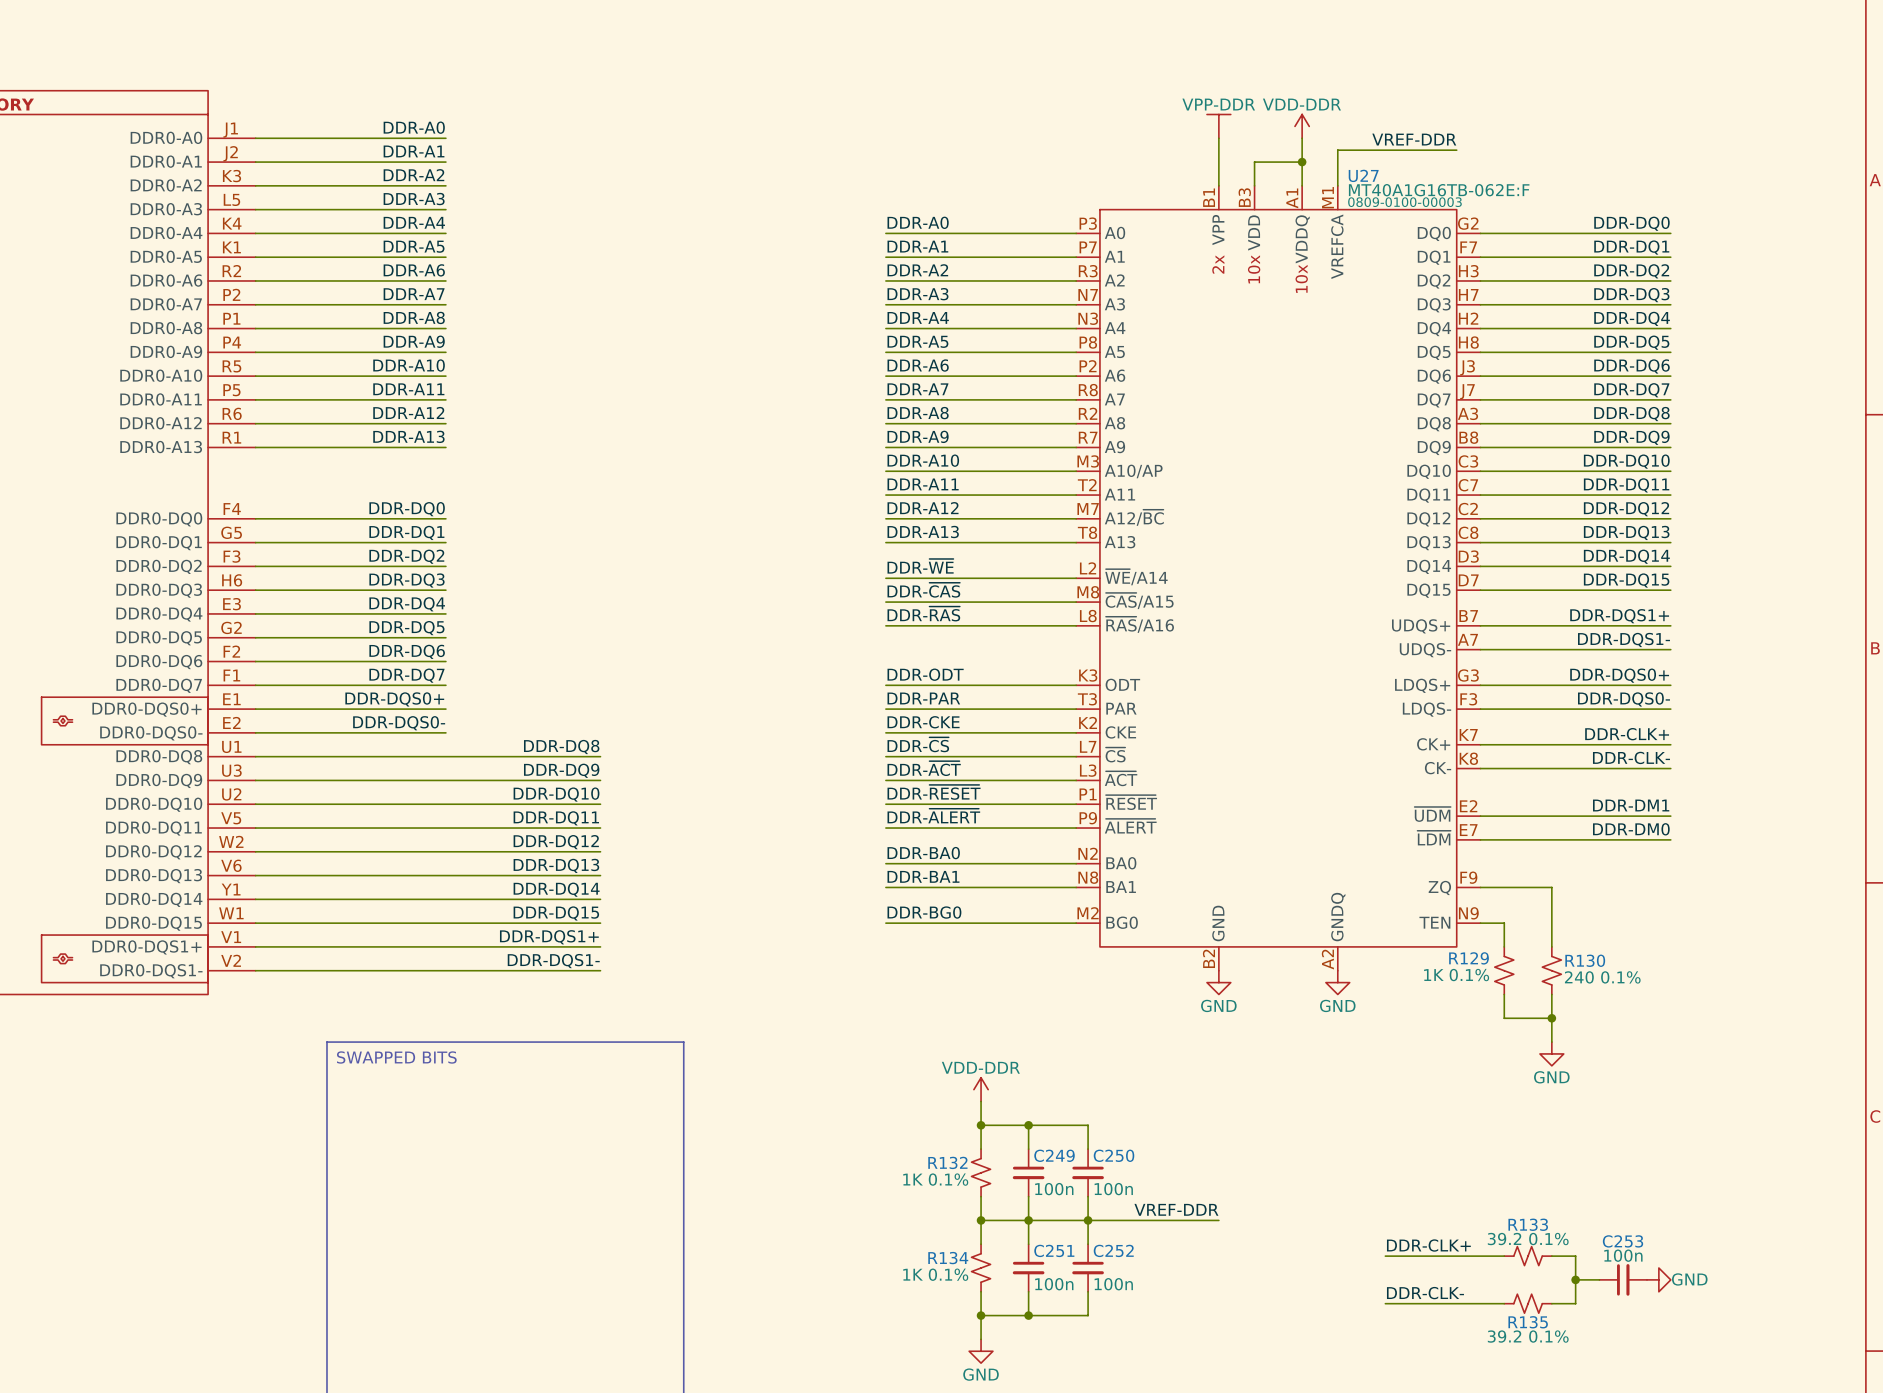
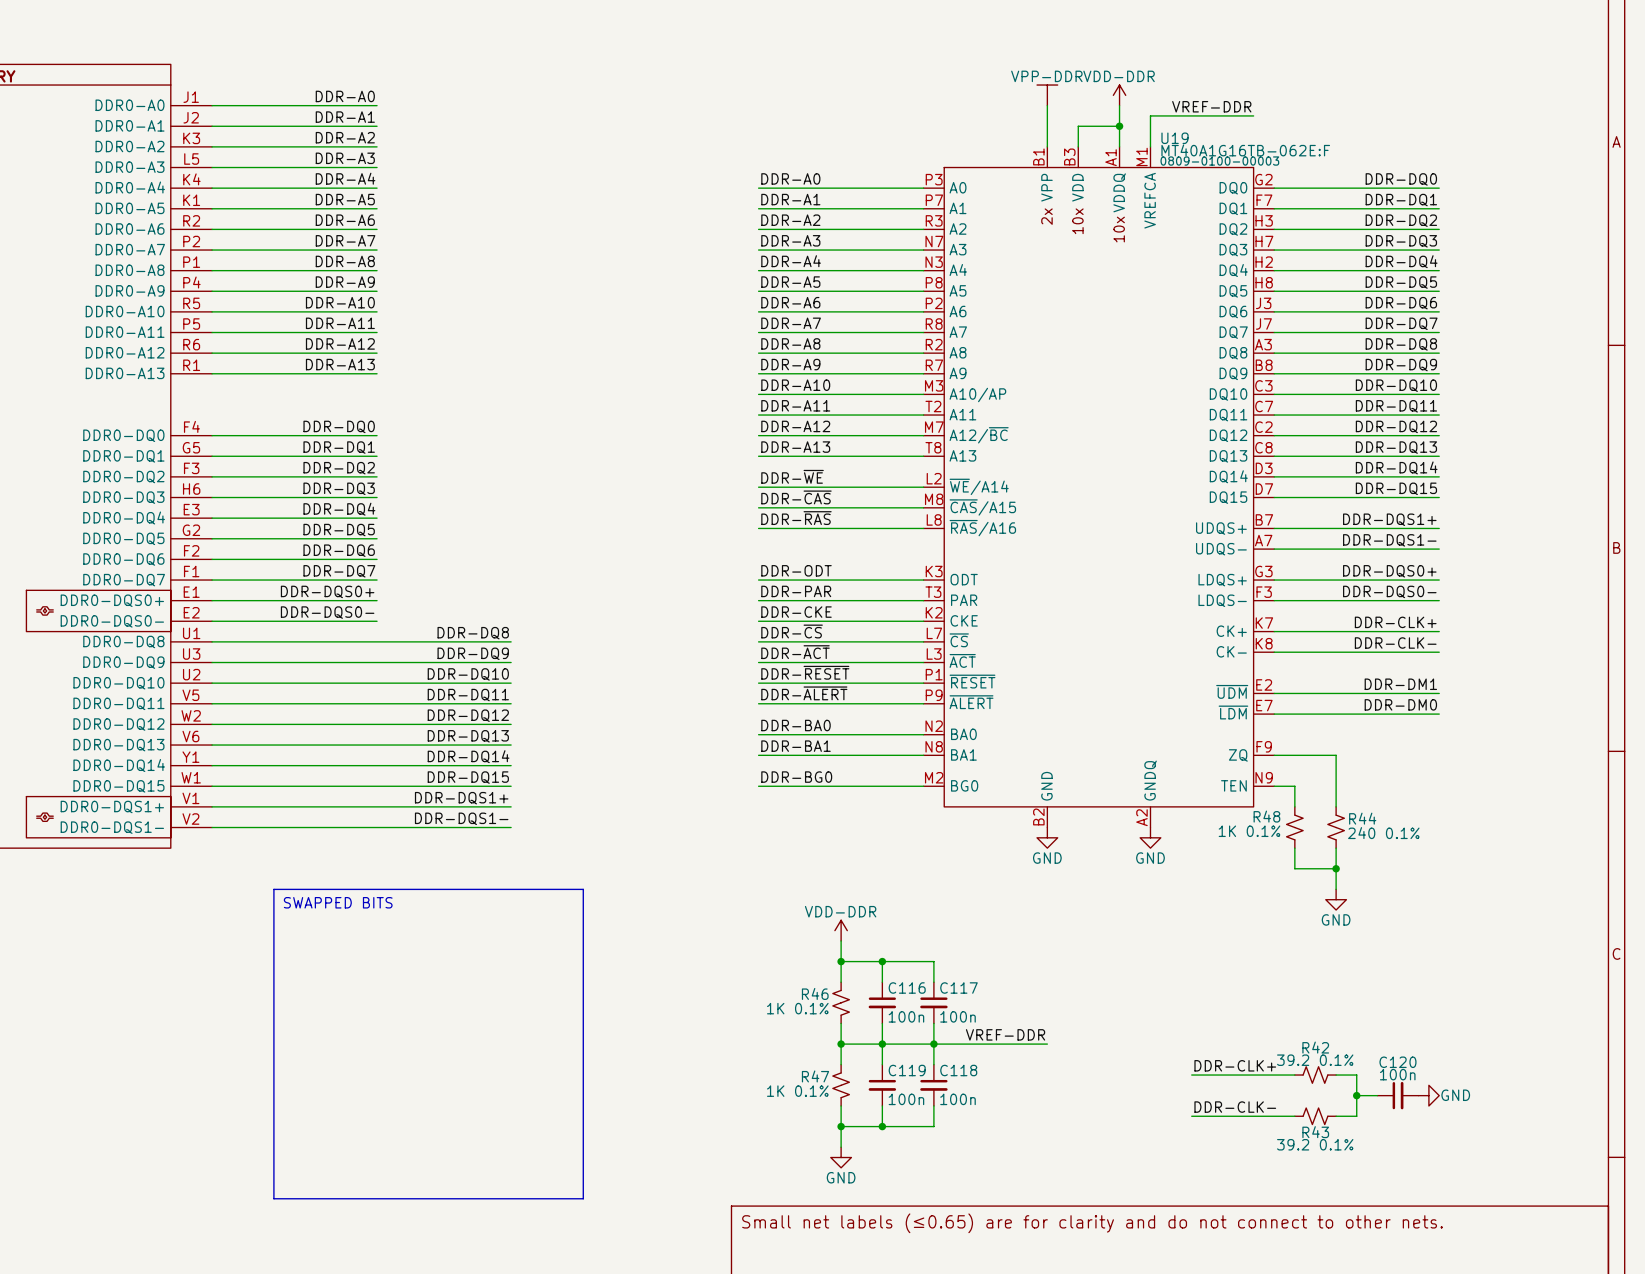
U27 name: U27 (1363, 175) -> U19 (1175, 138)
R129 name: R129 (1469, 958) -> R48 (1266, 816)
R130 name: R130 (1585, 960) -> R44 (1362, 818)
C249 name: C249 (1054, 1155) -> C116 (907, 988)
C250 name: C250 (1114, 1155) -> C117 (958, 988)
R132 name: R132 (947, 1162) -> R46 (815, 993)
R133 name: R133 (1528, 1224) -> R42 (1315, 1047)
C253 name: C253 (1623, 1241) -> C120 (1397, 1062)
C251 name: C251 (1054, 1250) -> C119 (907, 1070)
C252 name: C252 (1113, 1250) -> C118 (958, 1070)
R134 name: R134 (948, 1258) -> R47 (815, 1076)
R135 name: R135 (1528, 1322) -> R43 (1315, 1132)

